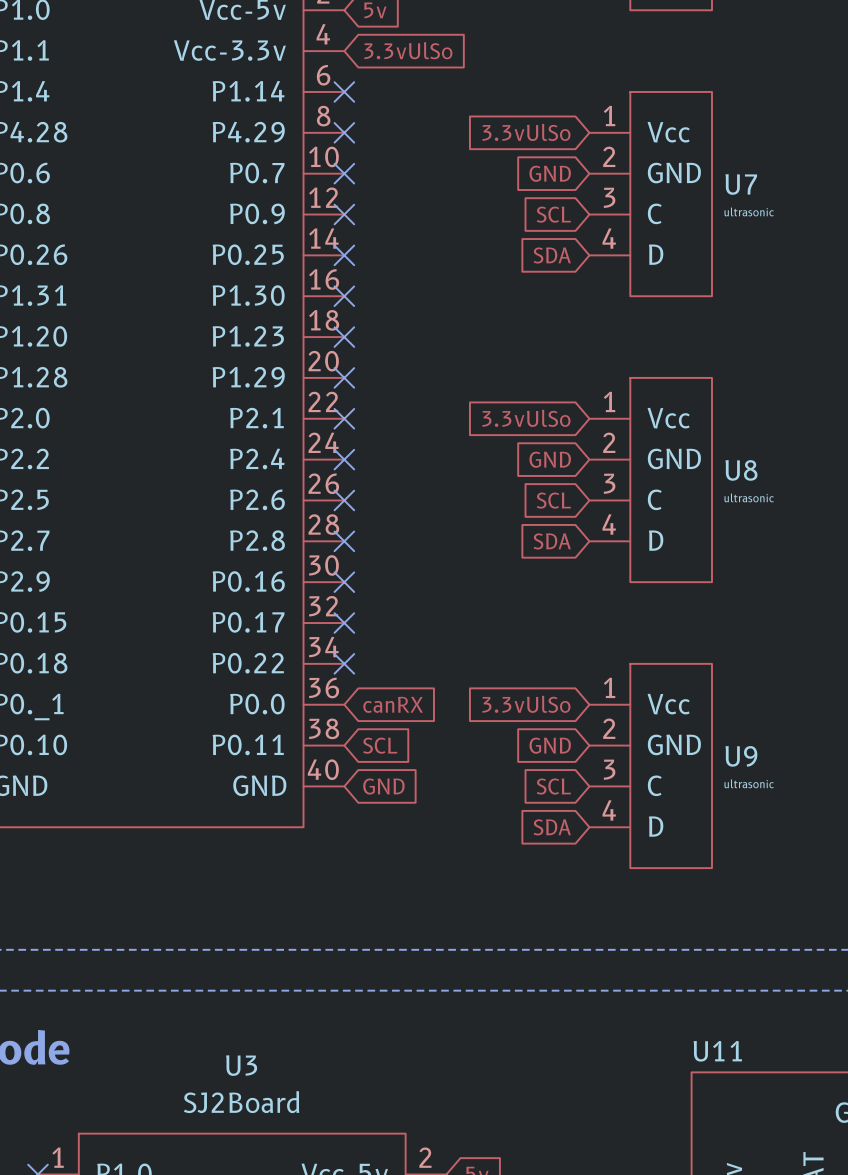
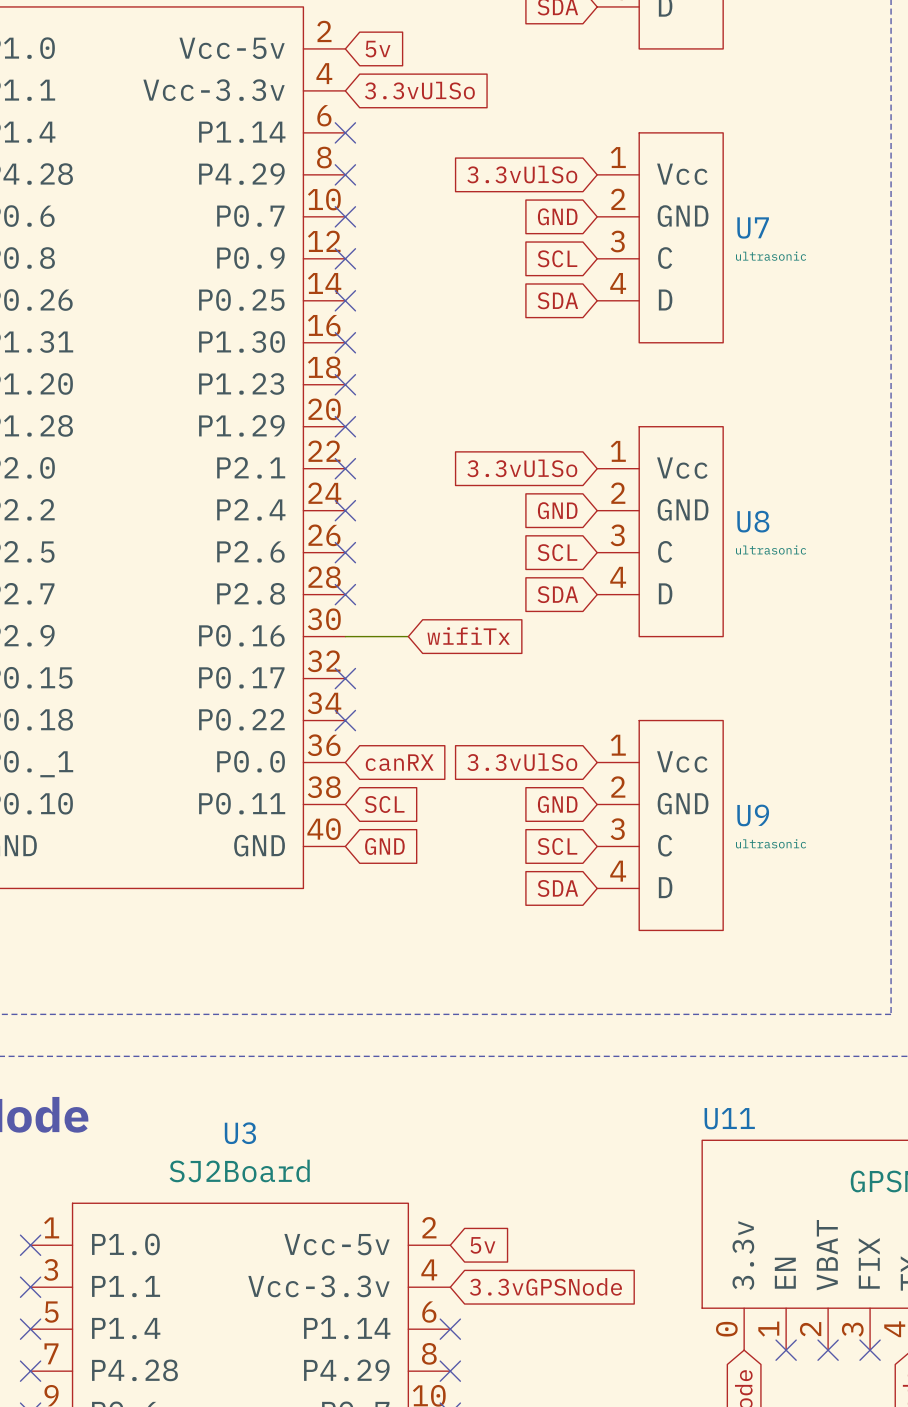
global label: none -> wifiTx (468, 636)
wire: none -> (345, 636) (408, 636)
no-connect mark: (344, 582) -> none

